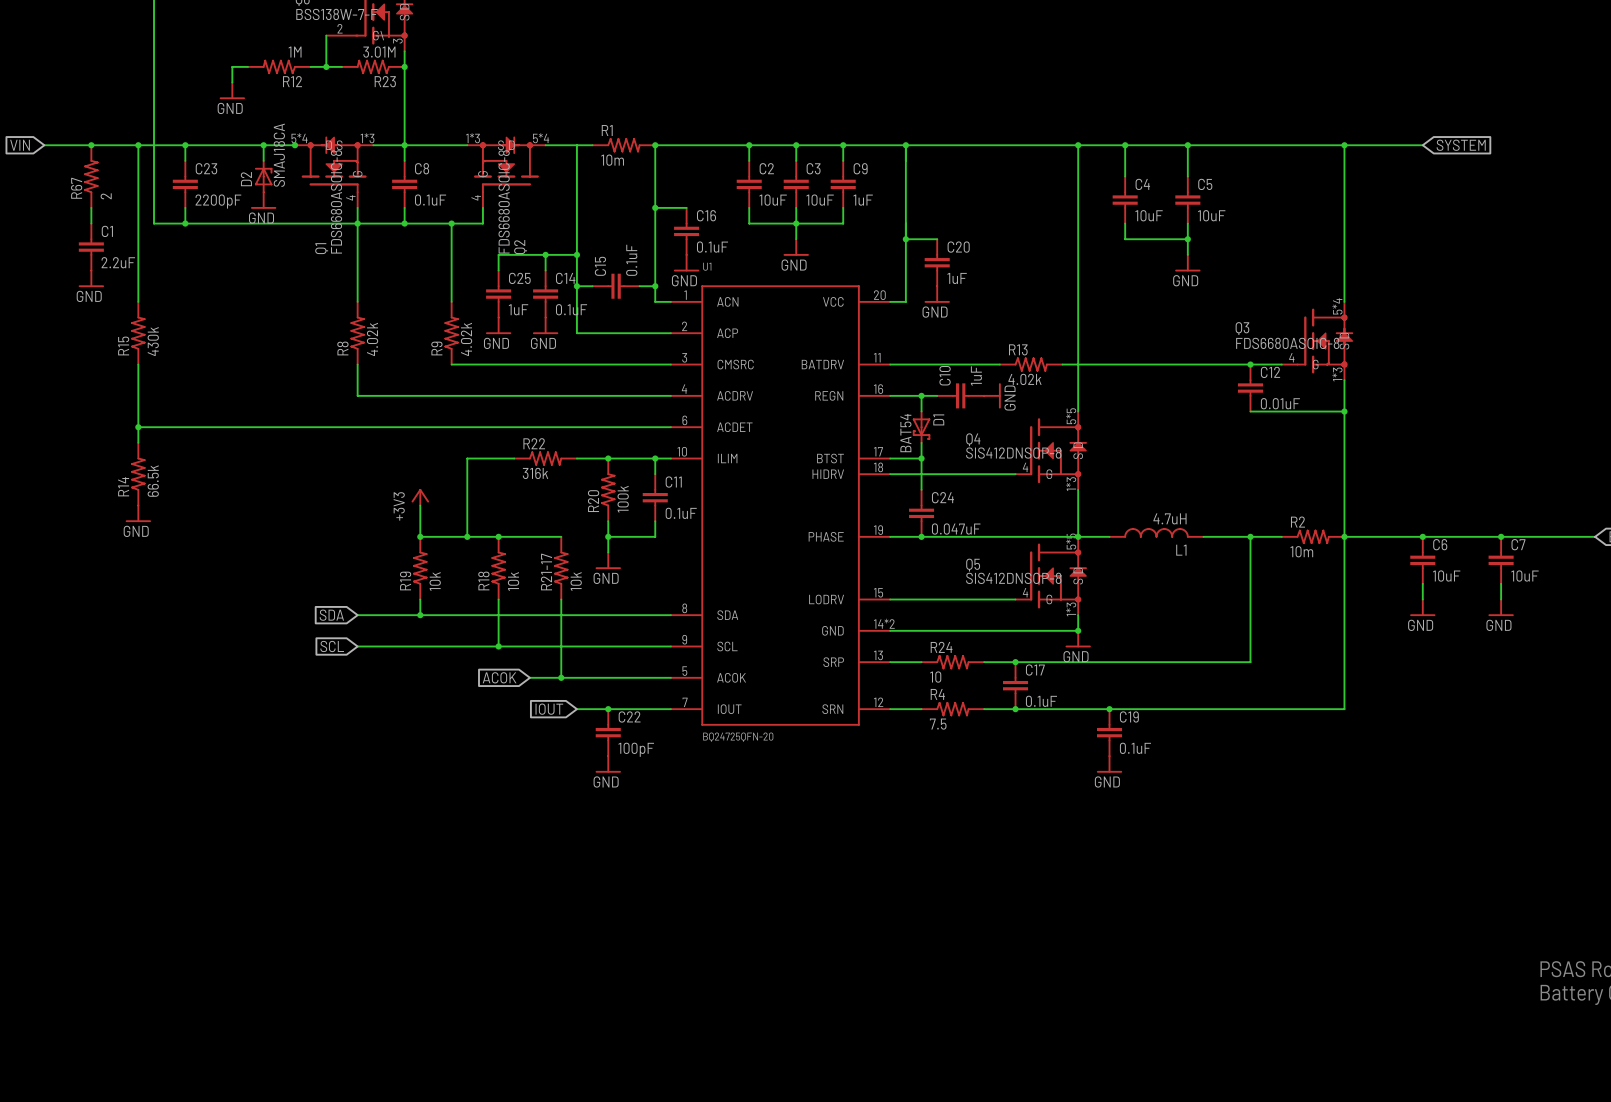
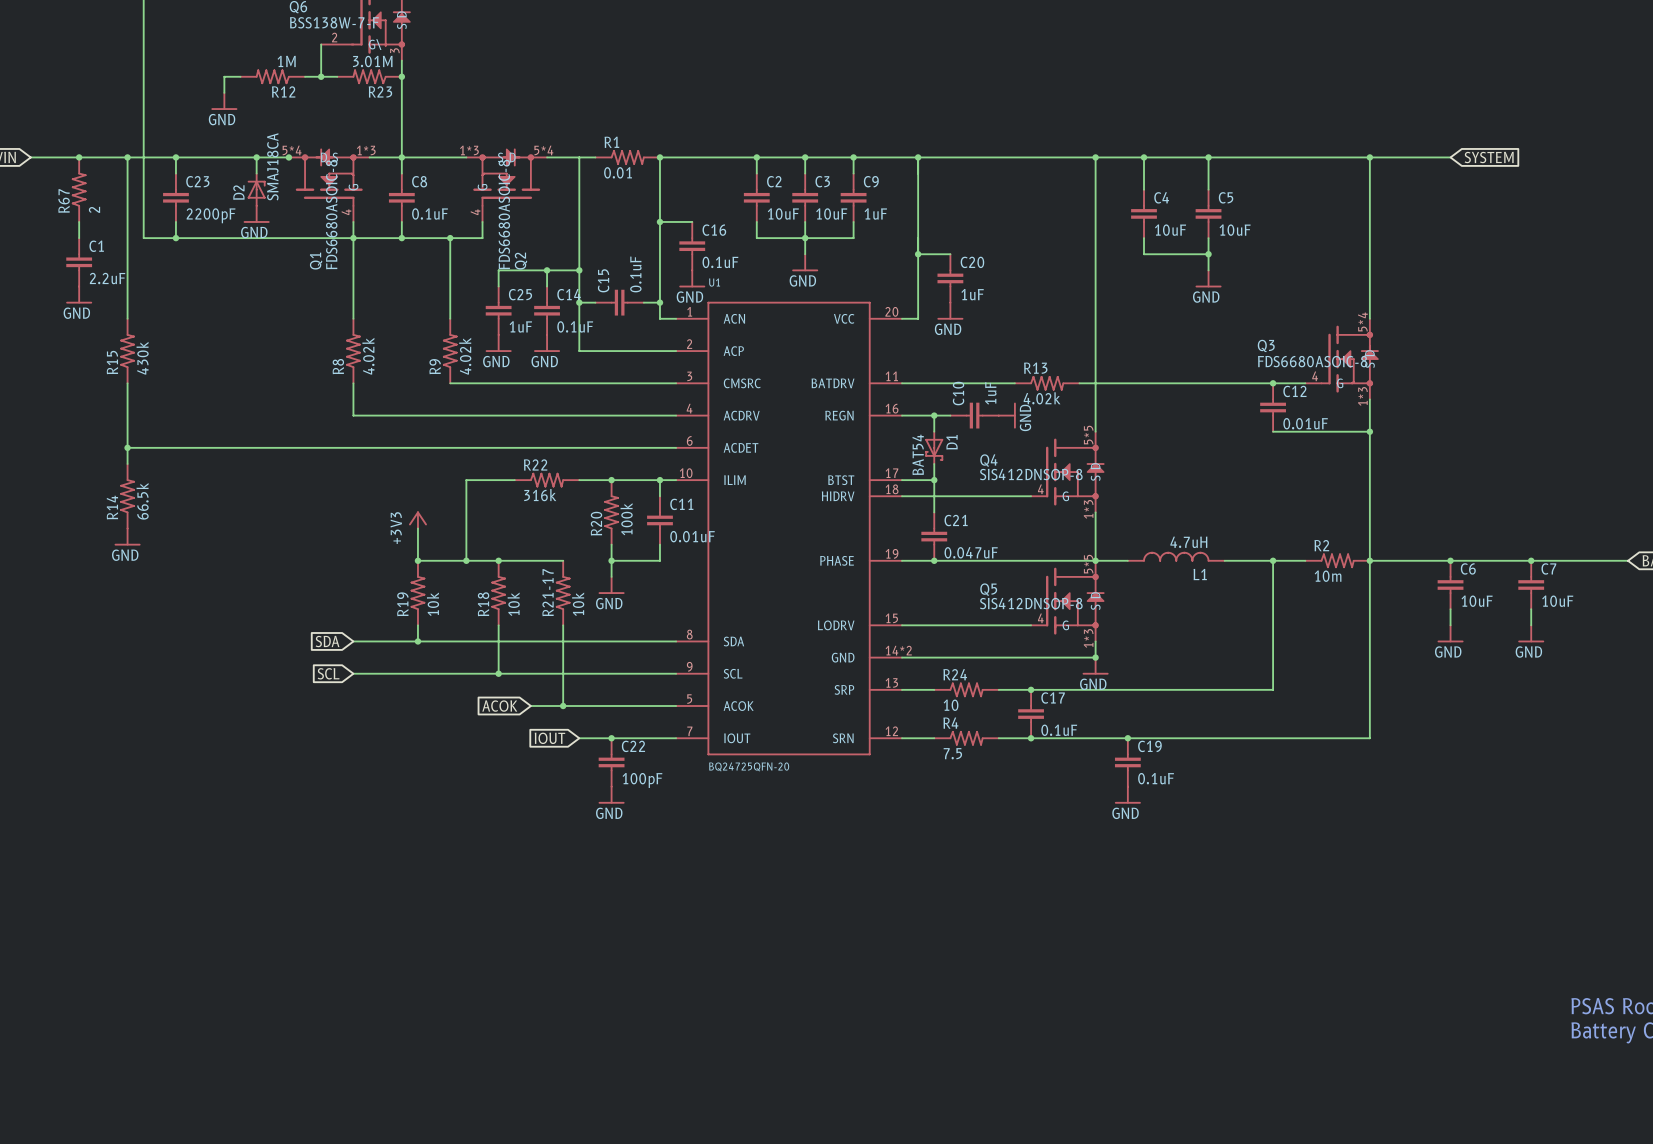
R1 value: 10m (612, 160) -> 0.01 (618, 172)
C24 name: C24 (942, 497) -> C21 (956, 520)
C11 value: 0.1uF (681, 513) -> 0.01uF (692, 536)

